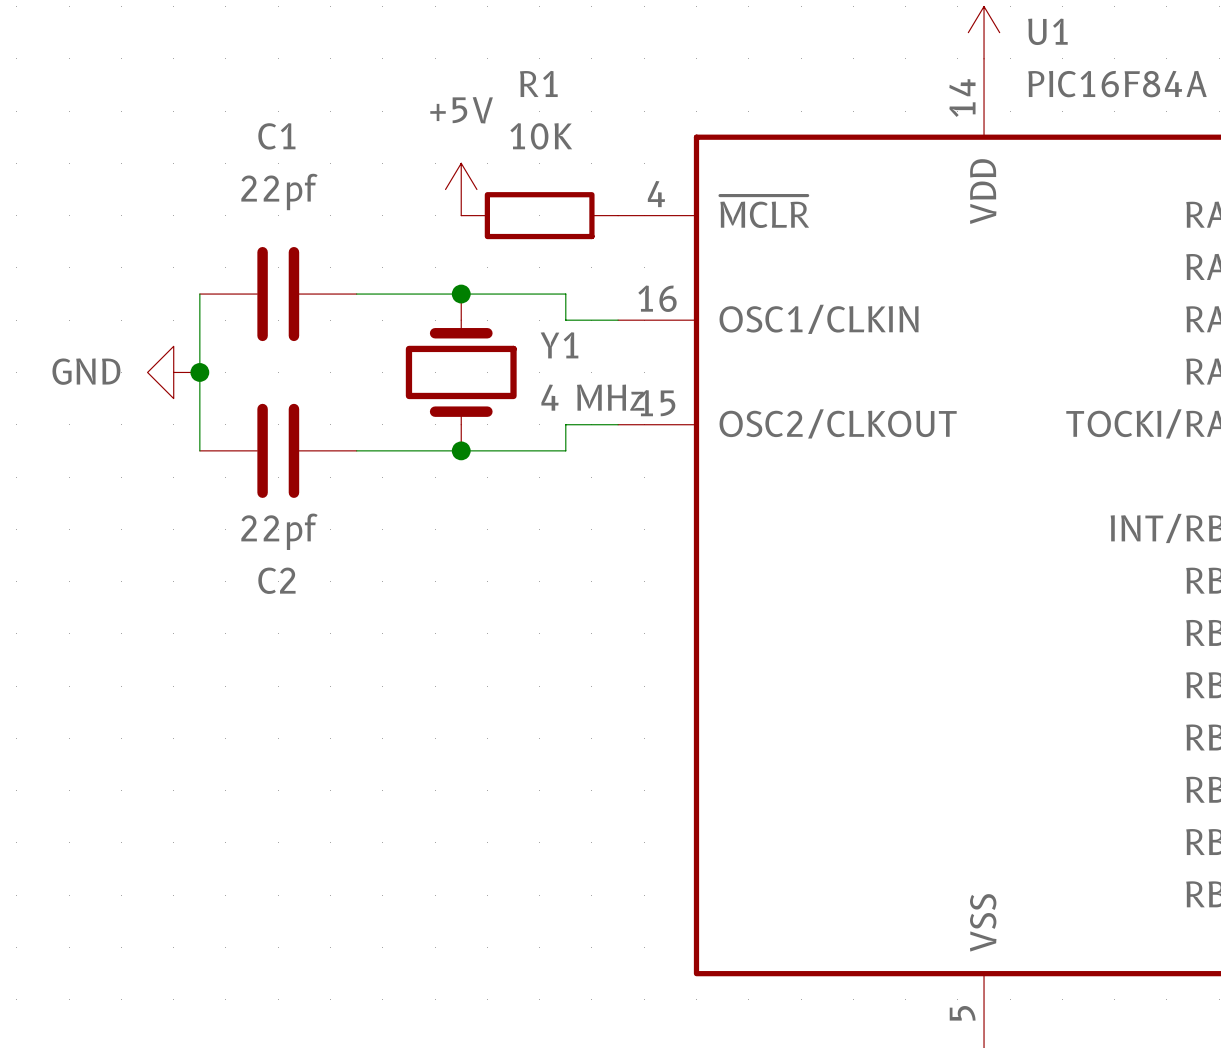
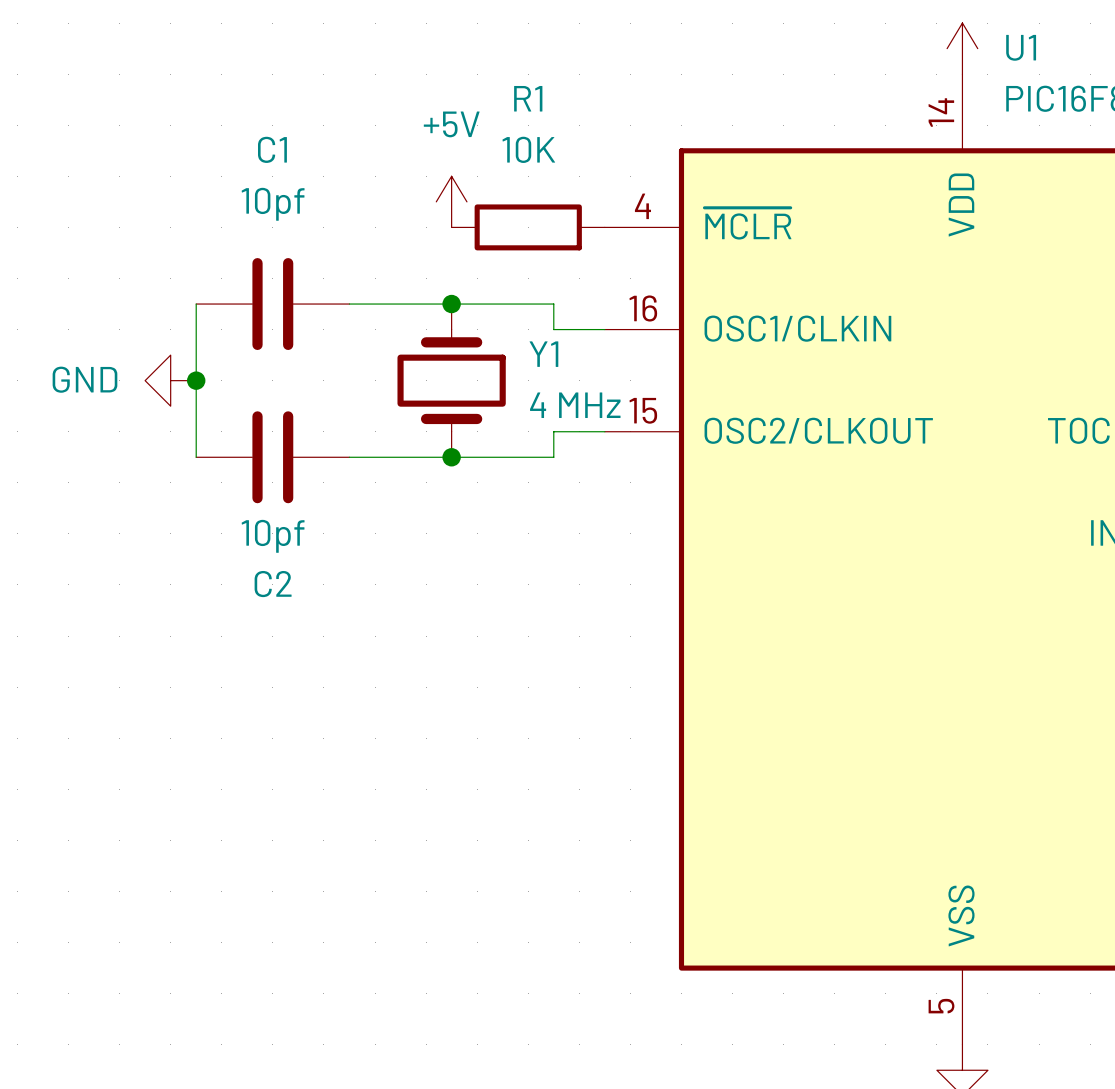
C1 value: 22pf (279, 191) -> 10pf (273, 204)
C2 value: 22pf (279, 531) -> 10pf (273, 536)

